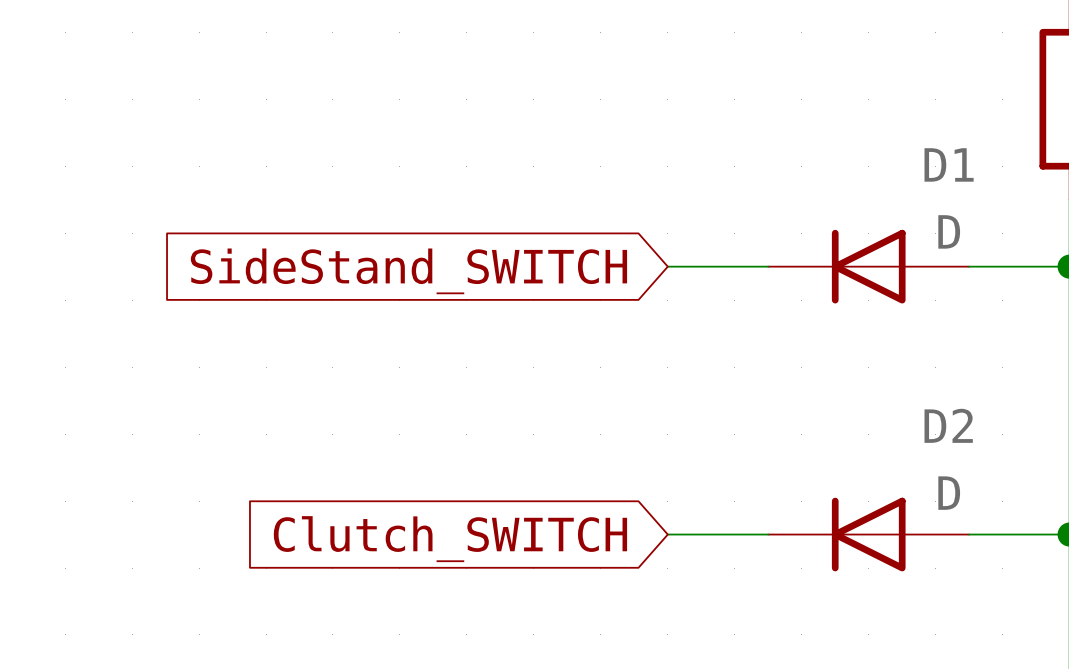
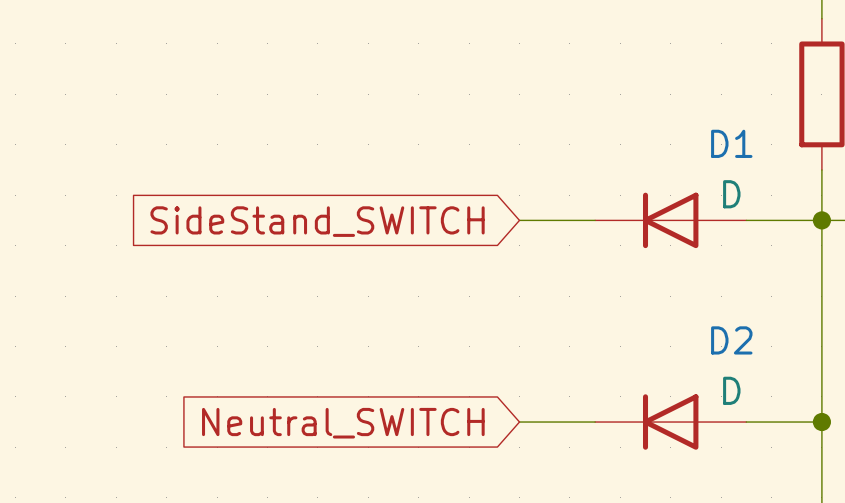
global label: Clutch_SWITCH (450, 539) -> Neutral_SWITCH (343, 423)

